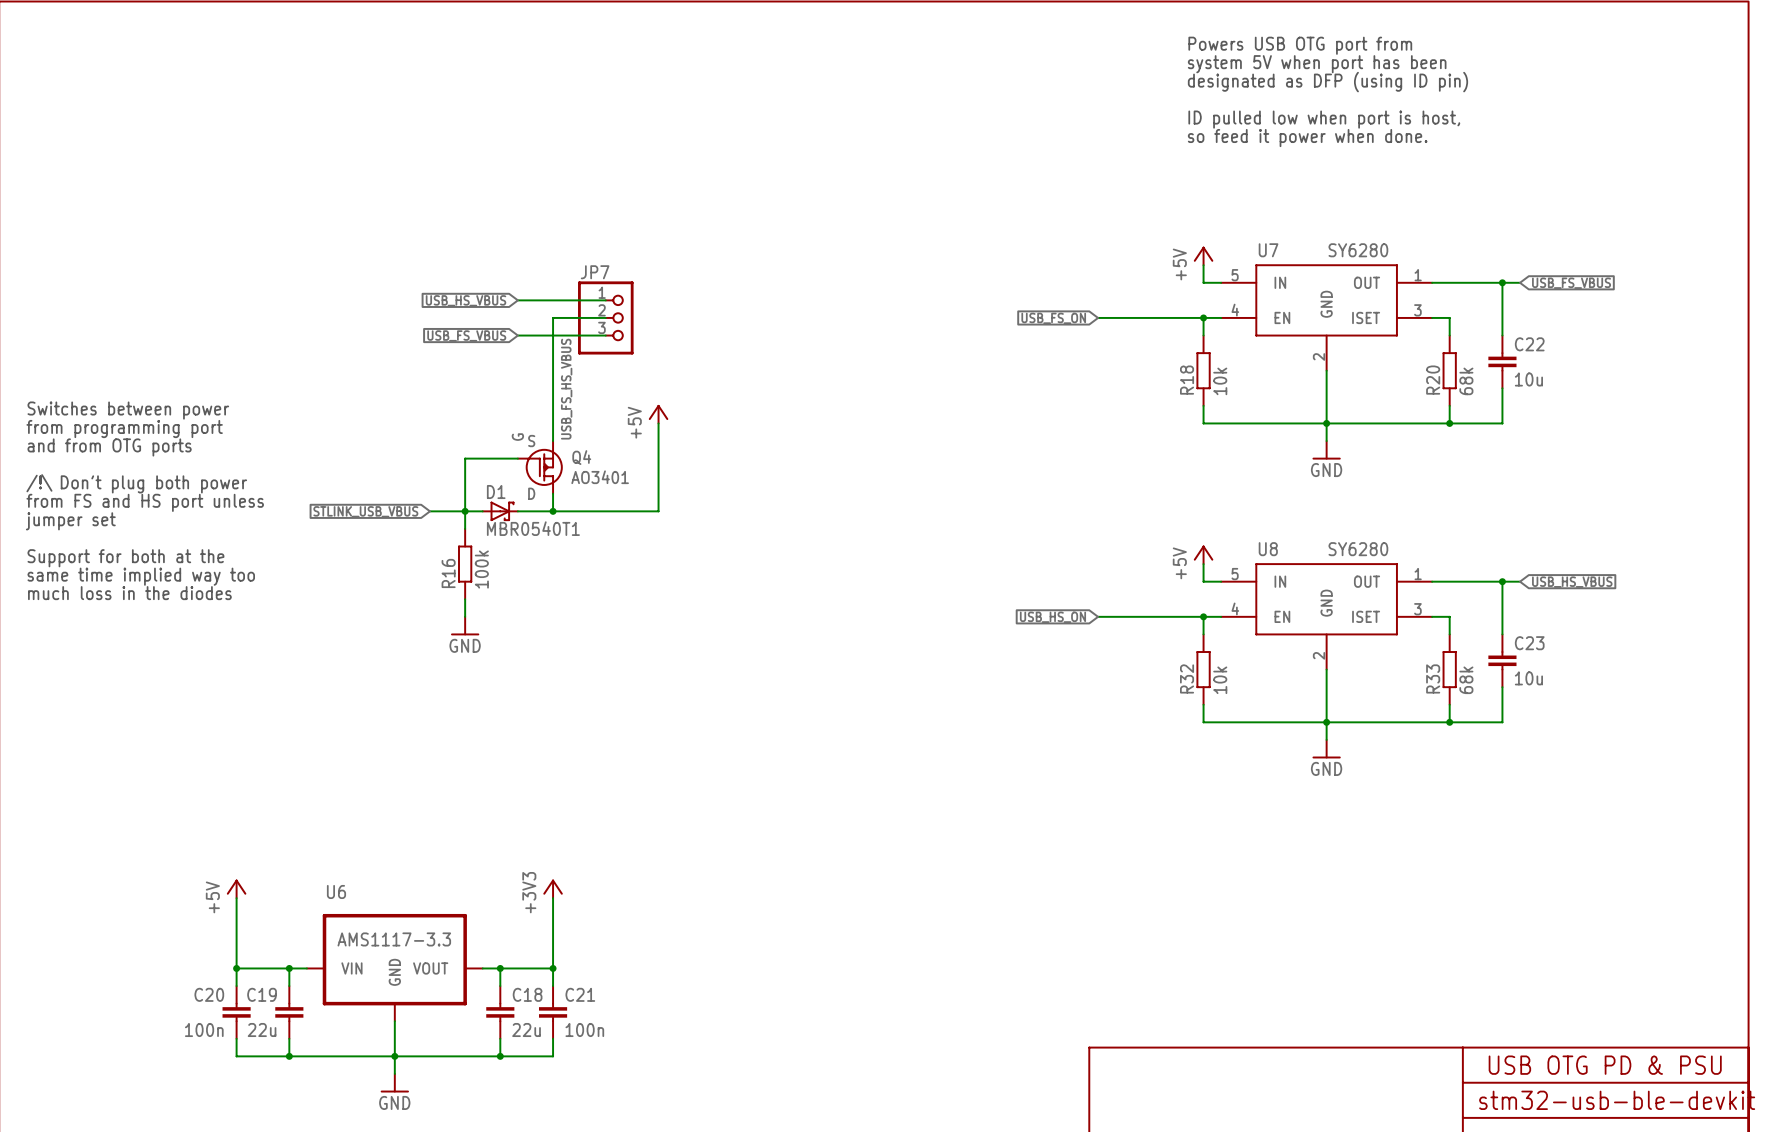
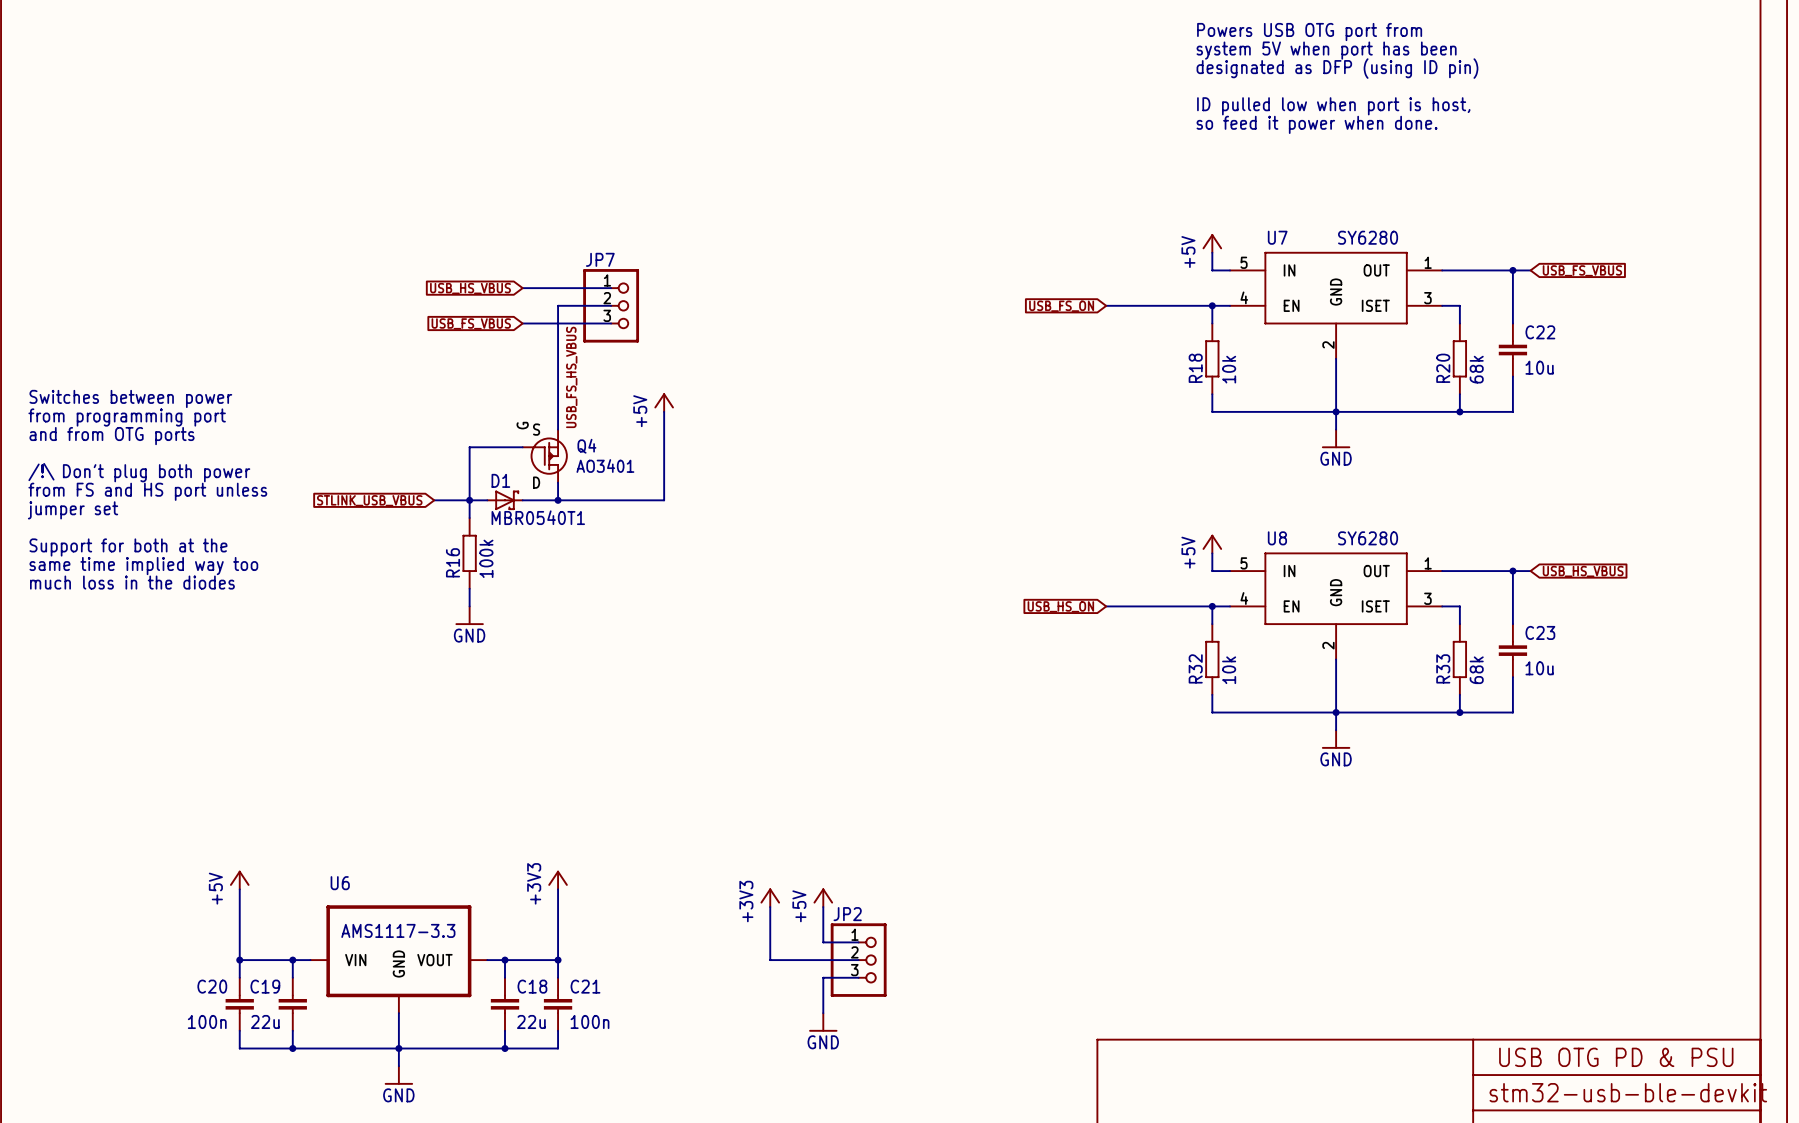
power symbol: none -> +3V3 (770, 897)
power symbol: none -> +5V (823, 897)
wire: none -> (770, 907) (770, 960) (858, 960)
wire: none -> (823, 907) (823, 942) (858, 942)
JP2: none -> (858, 960)
wire: none -> (858, 977) (823, 977) (823, 1013)
power symbol: none -> GND (823, 1022)

